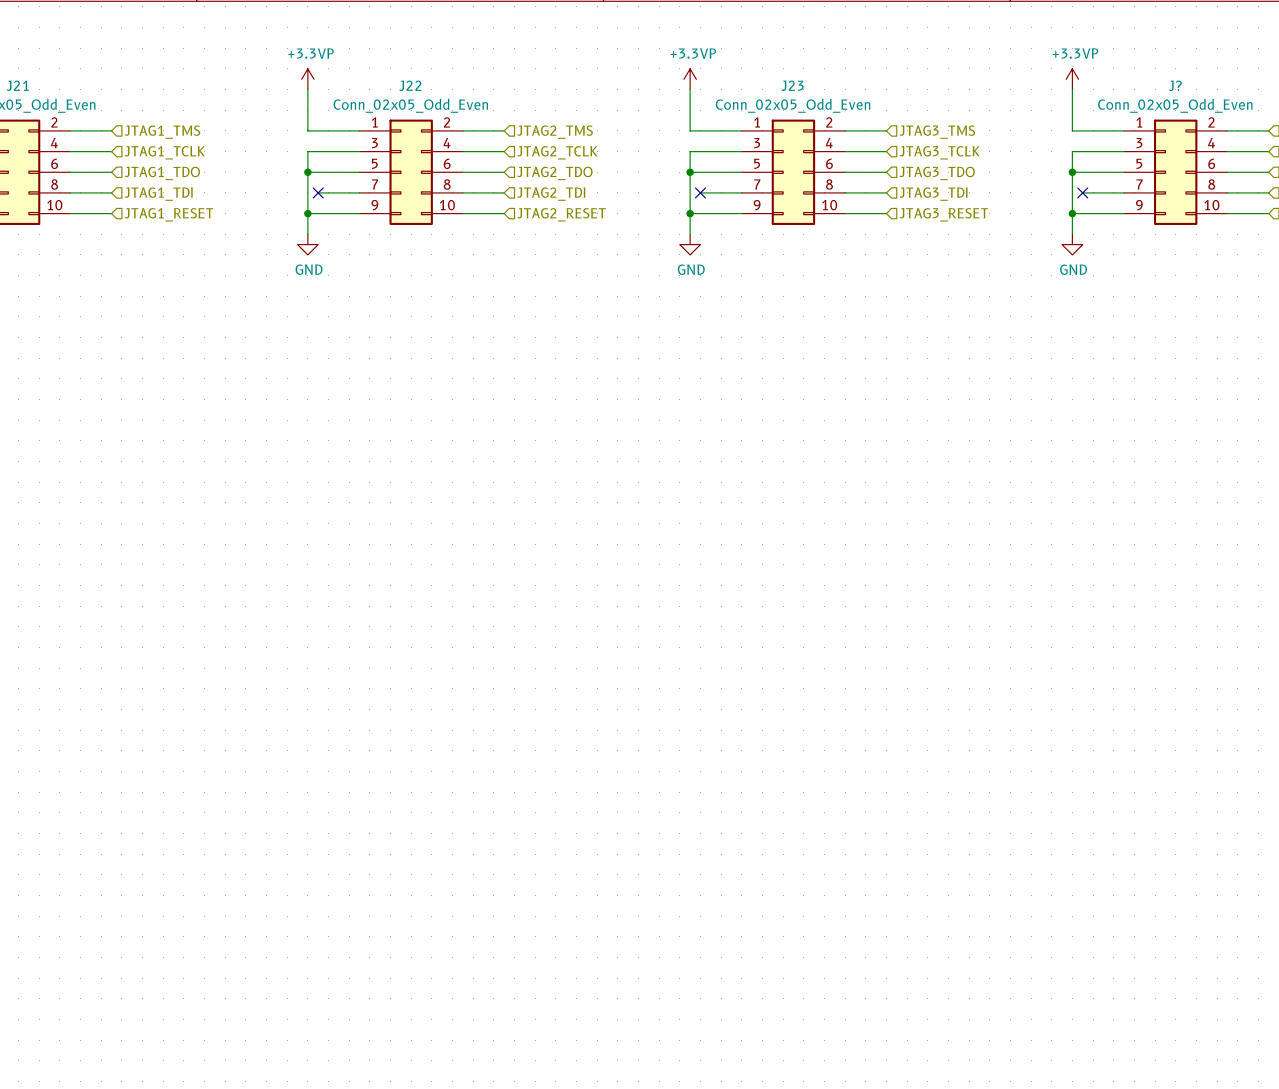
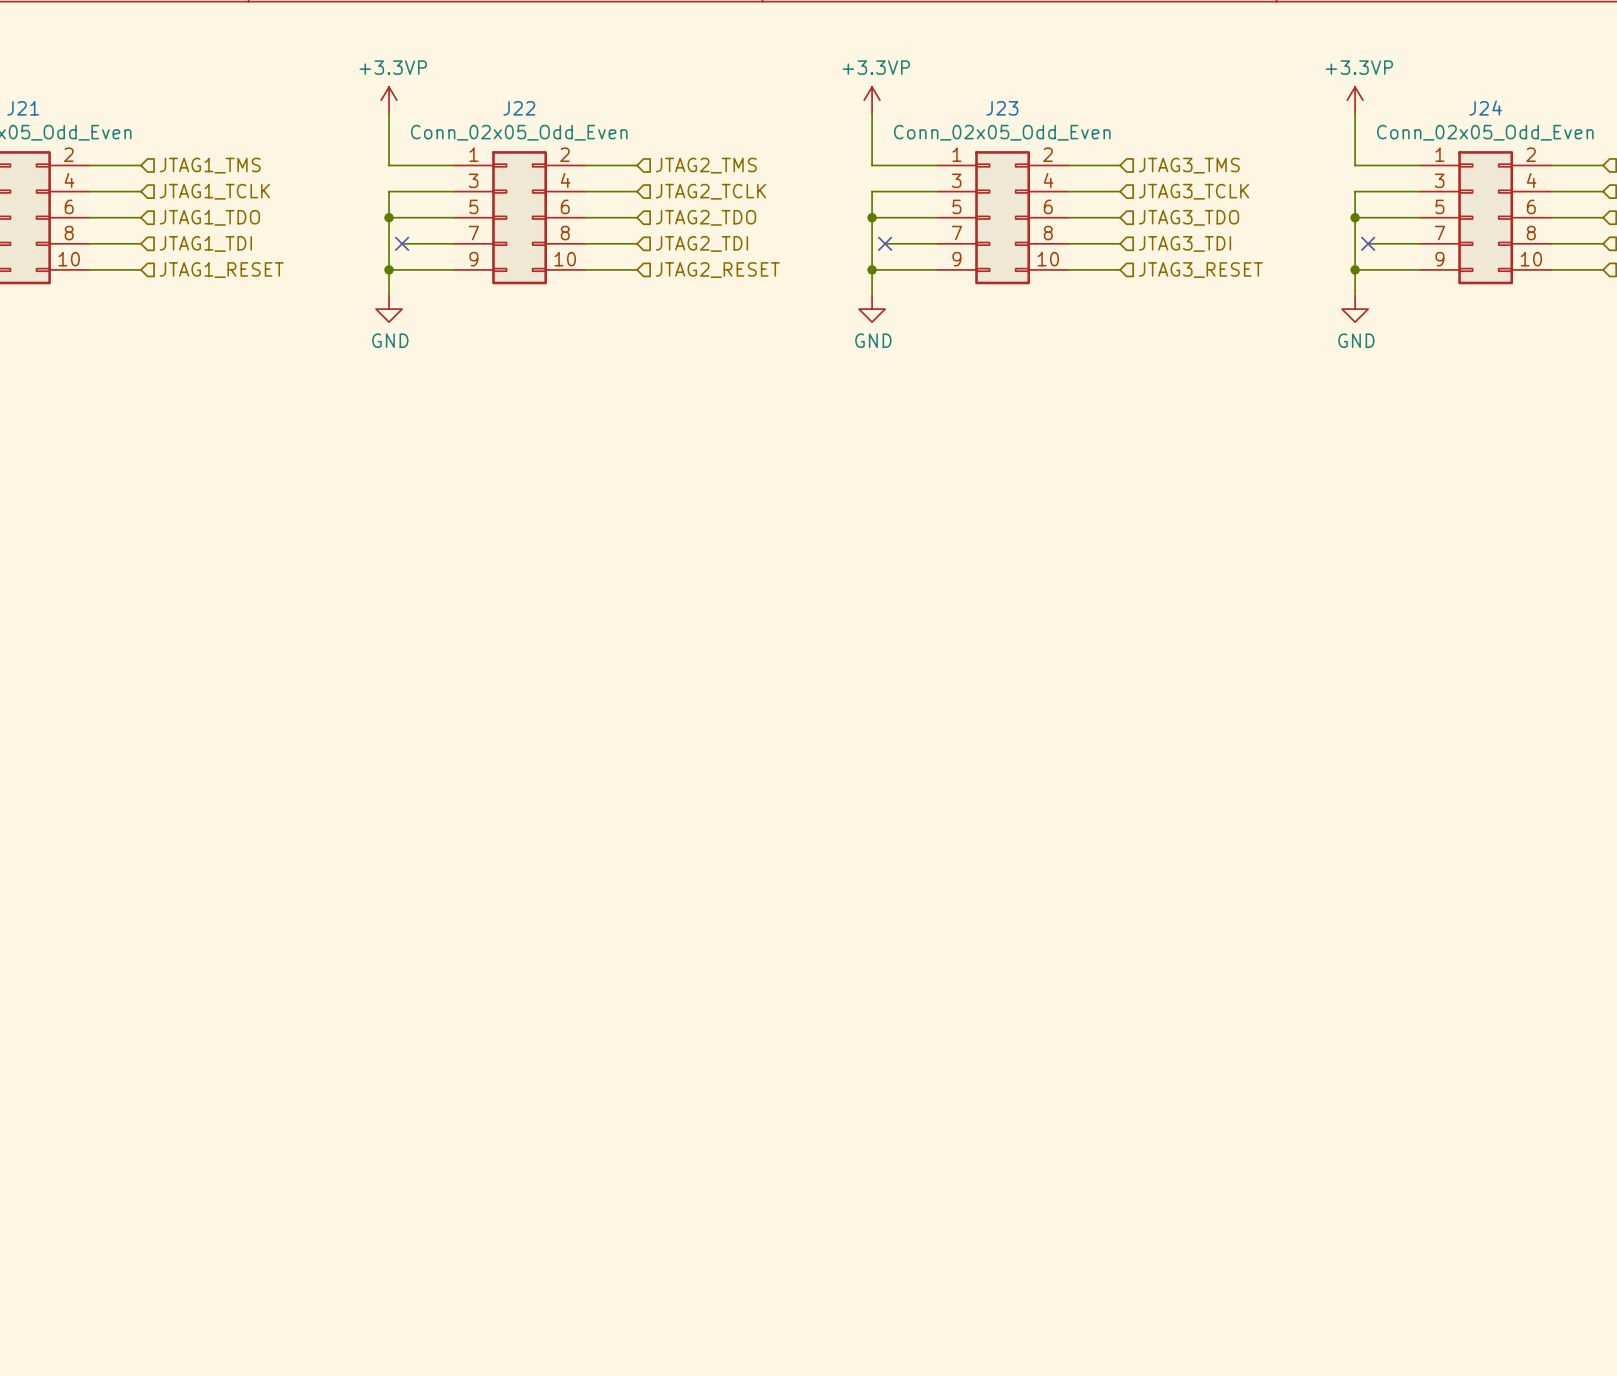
J? name: J? (1175, 85) -> J24 (1485, 108)

